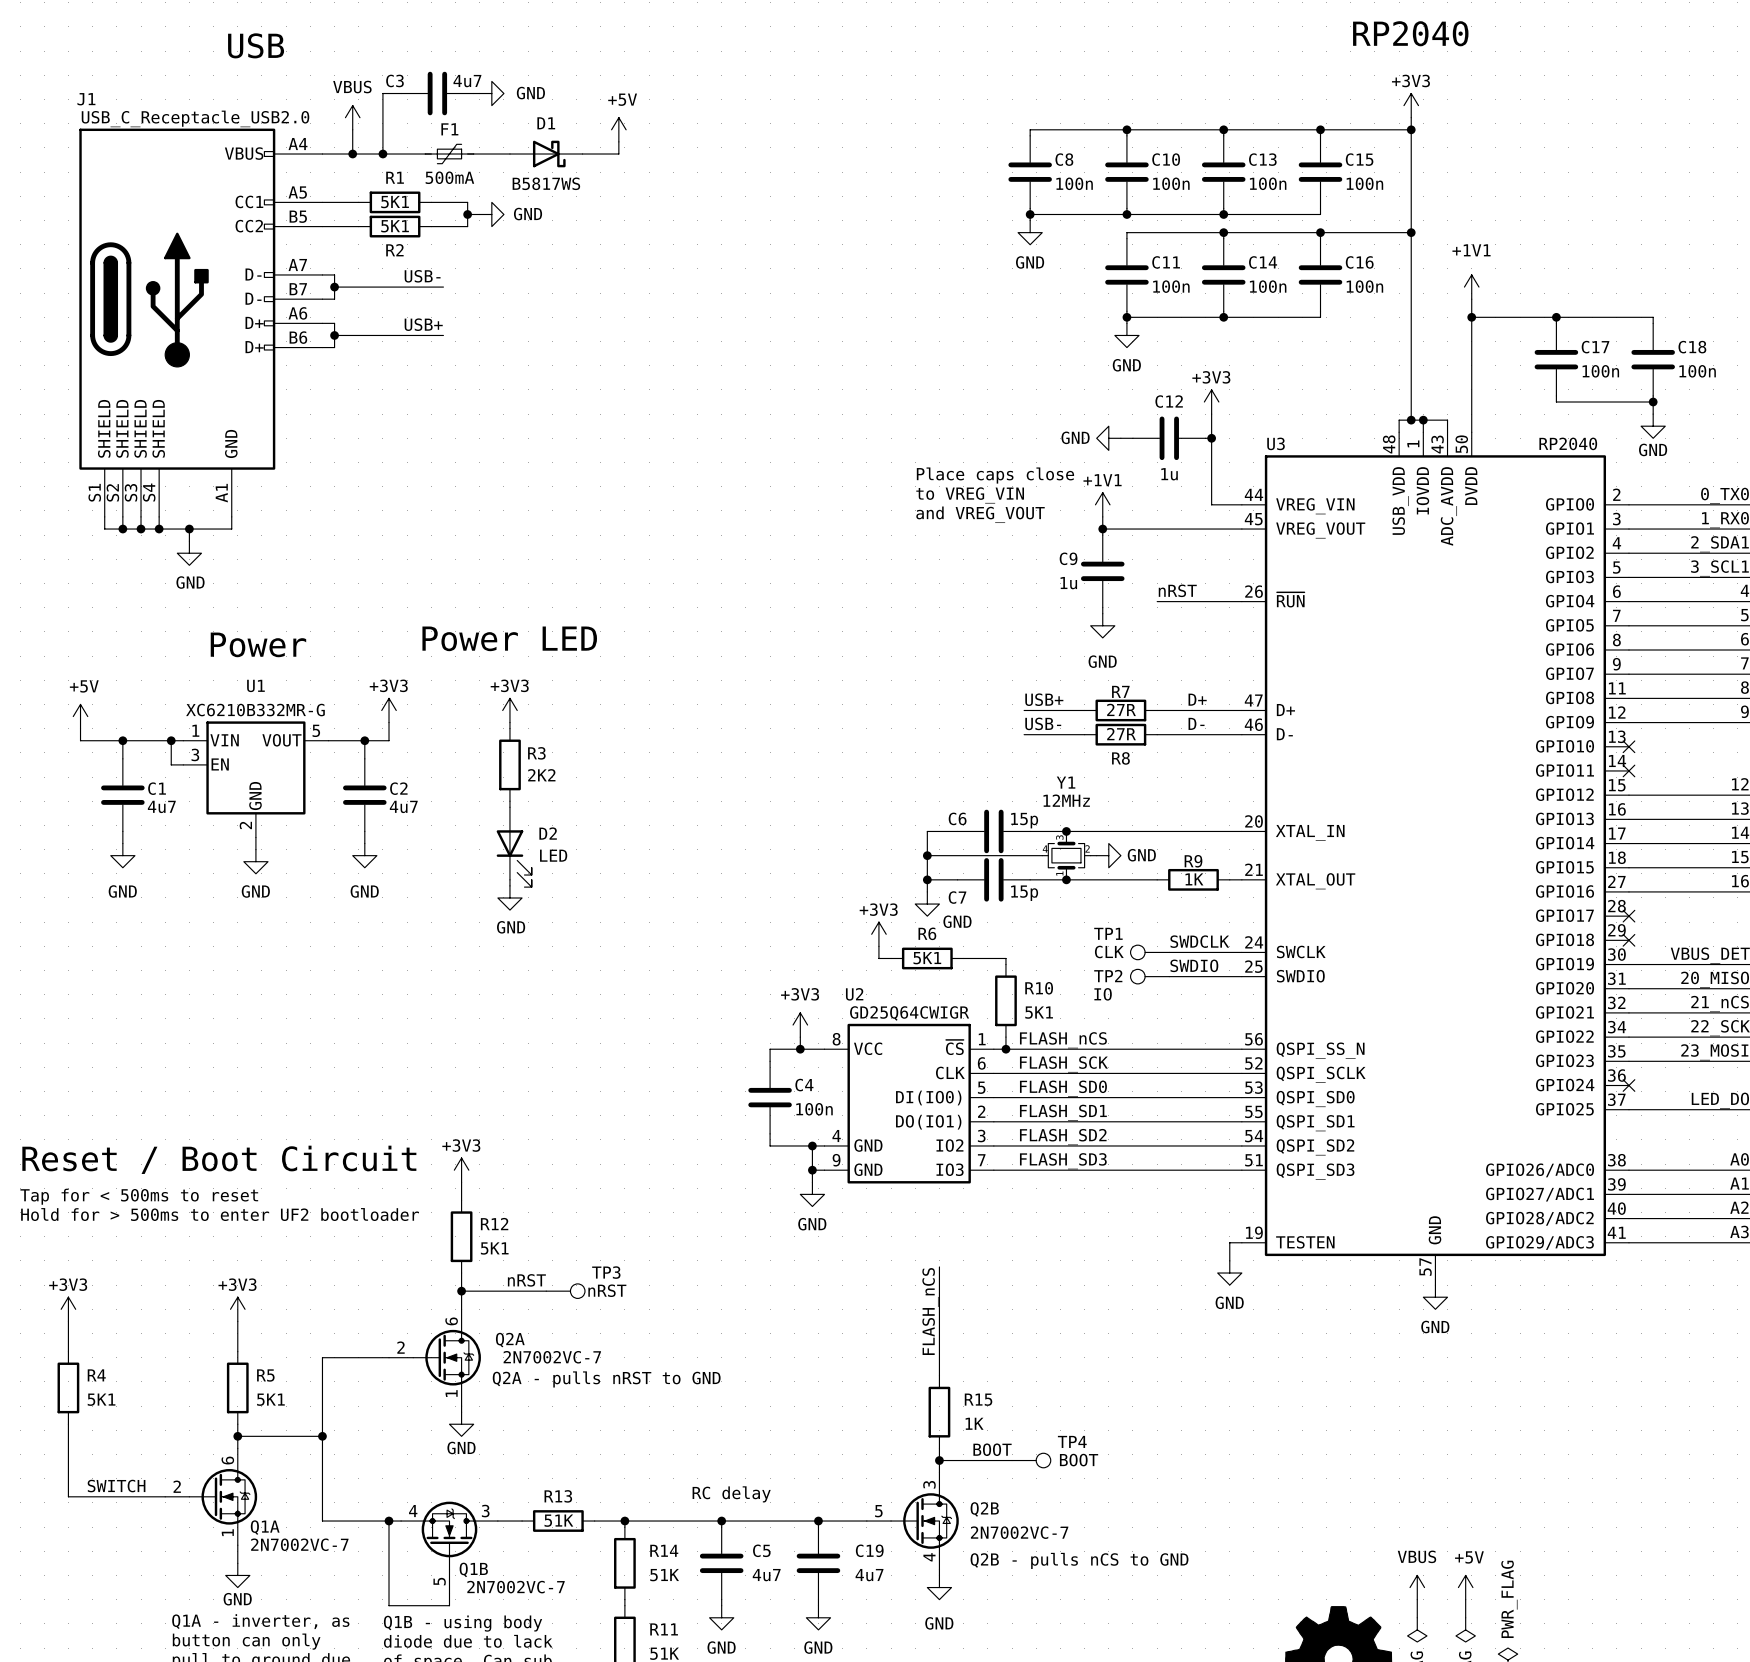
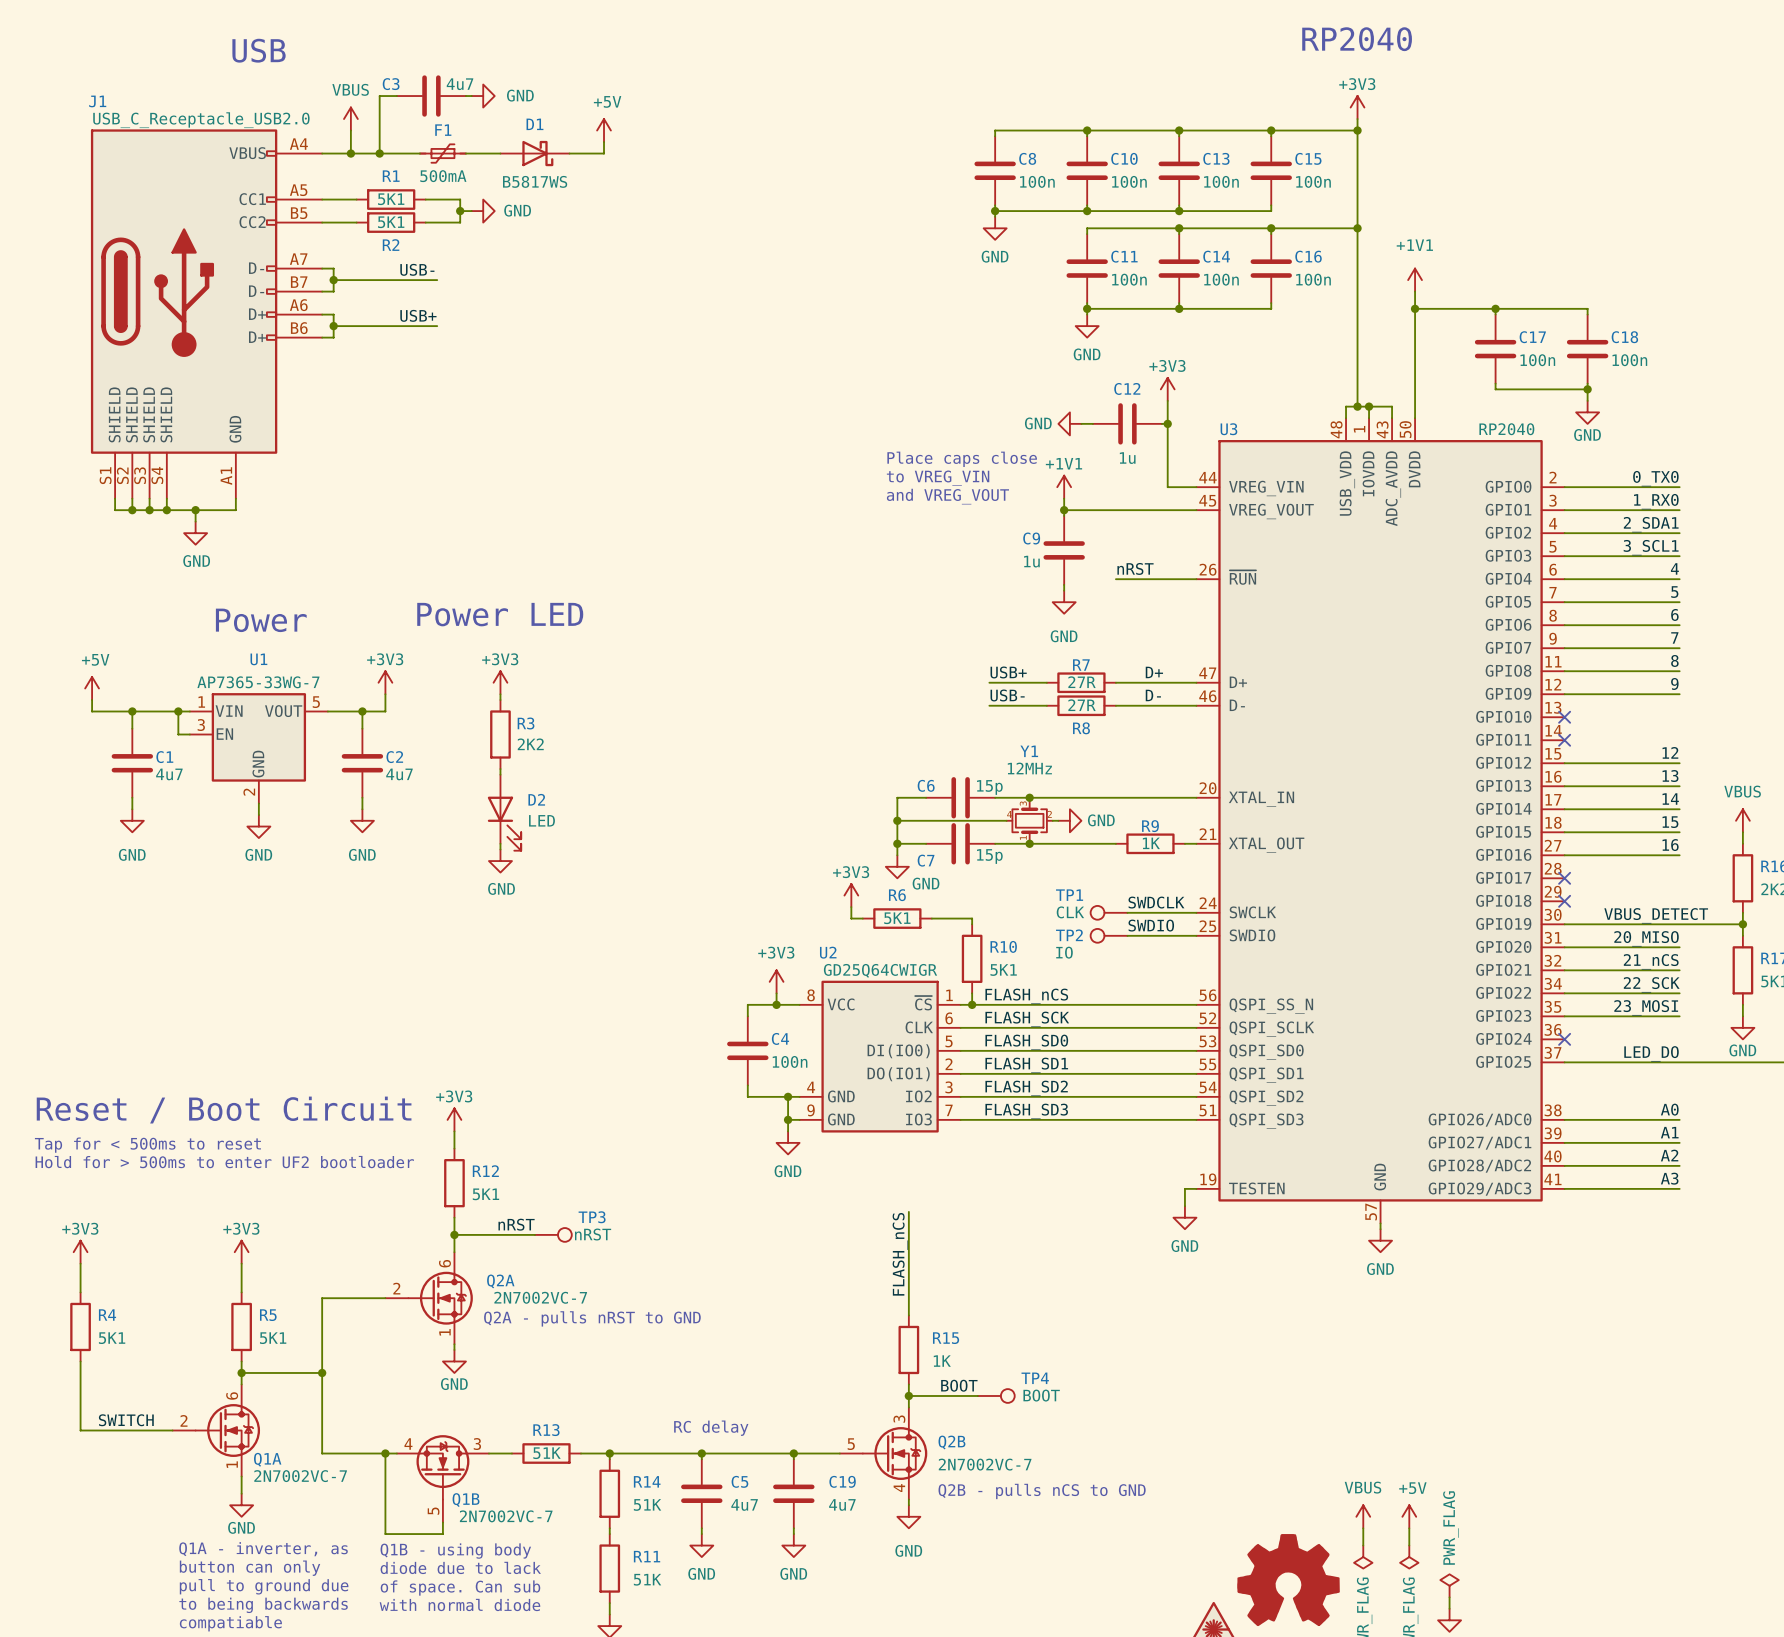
U1 value: XC6210B332MR-G (255, 710) -> AP7365-33WG-7 (258, 682)

